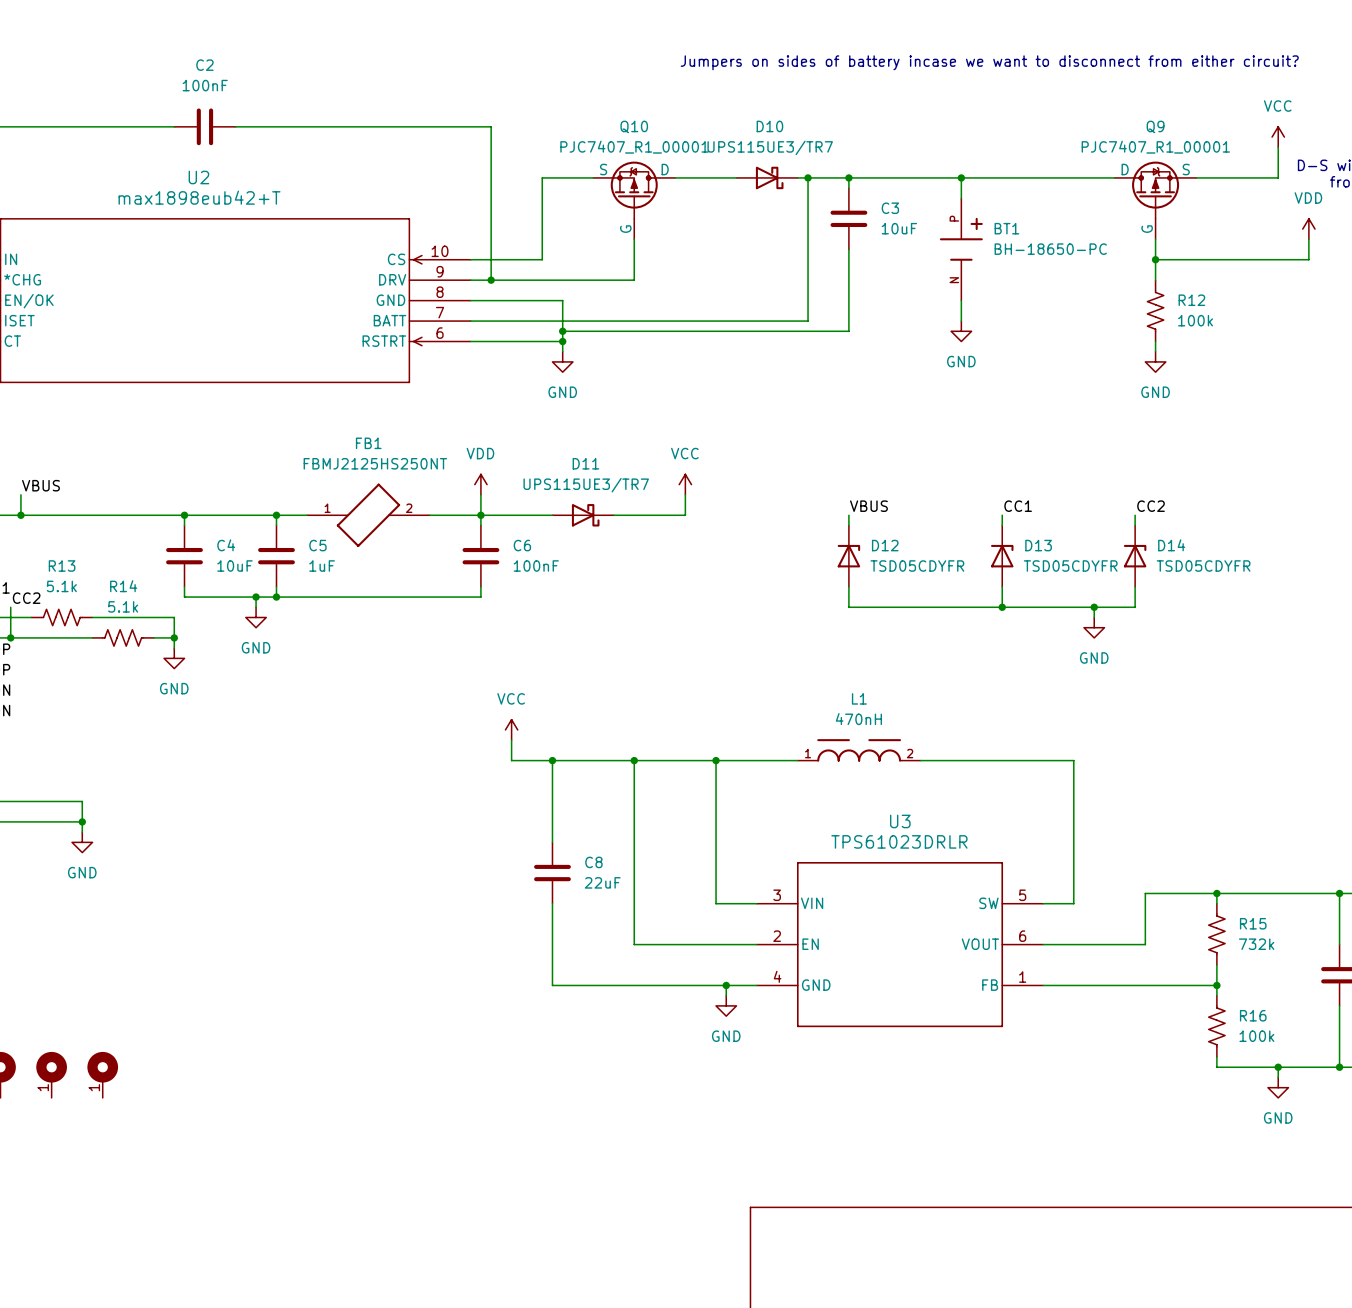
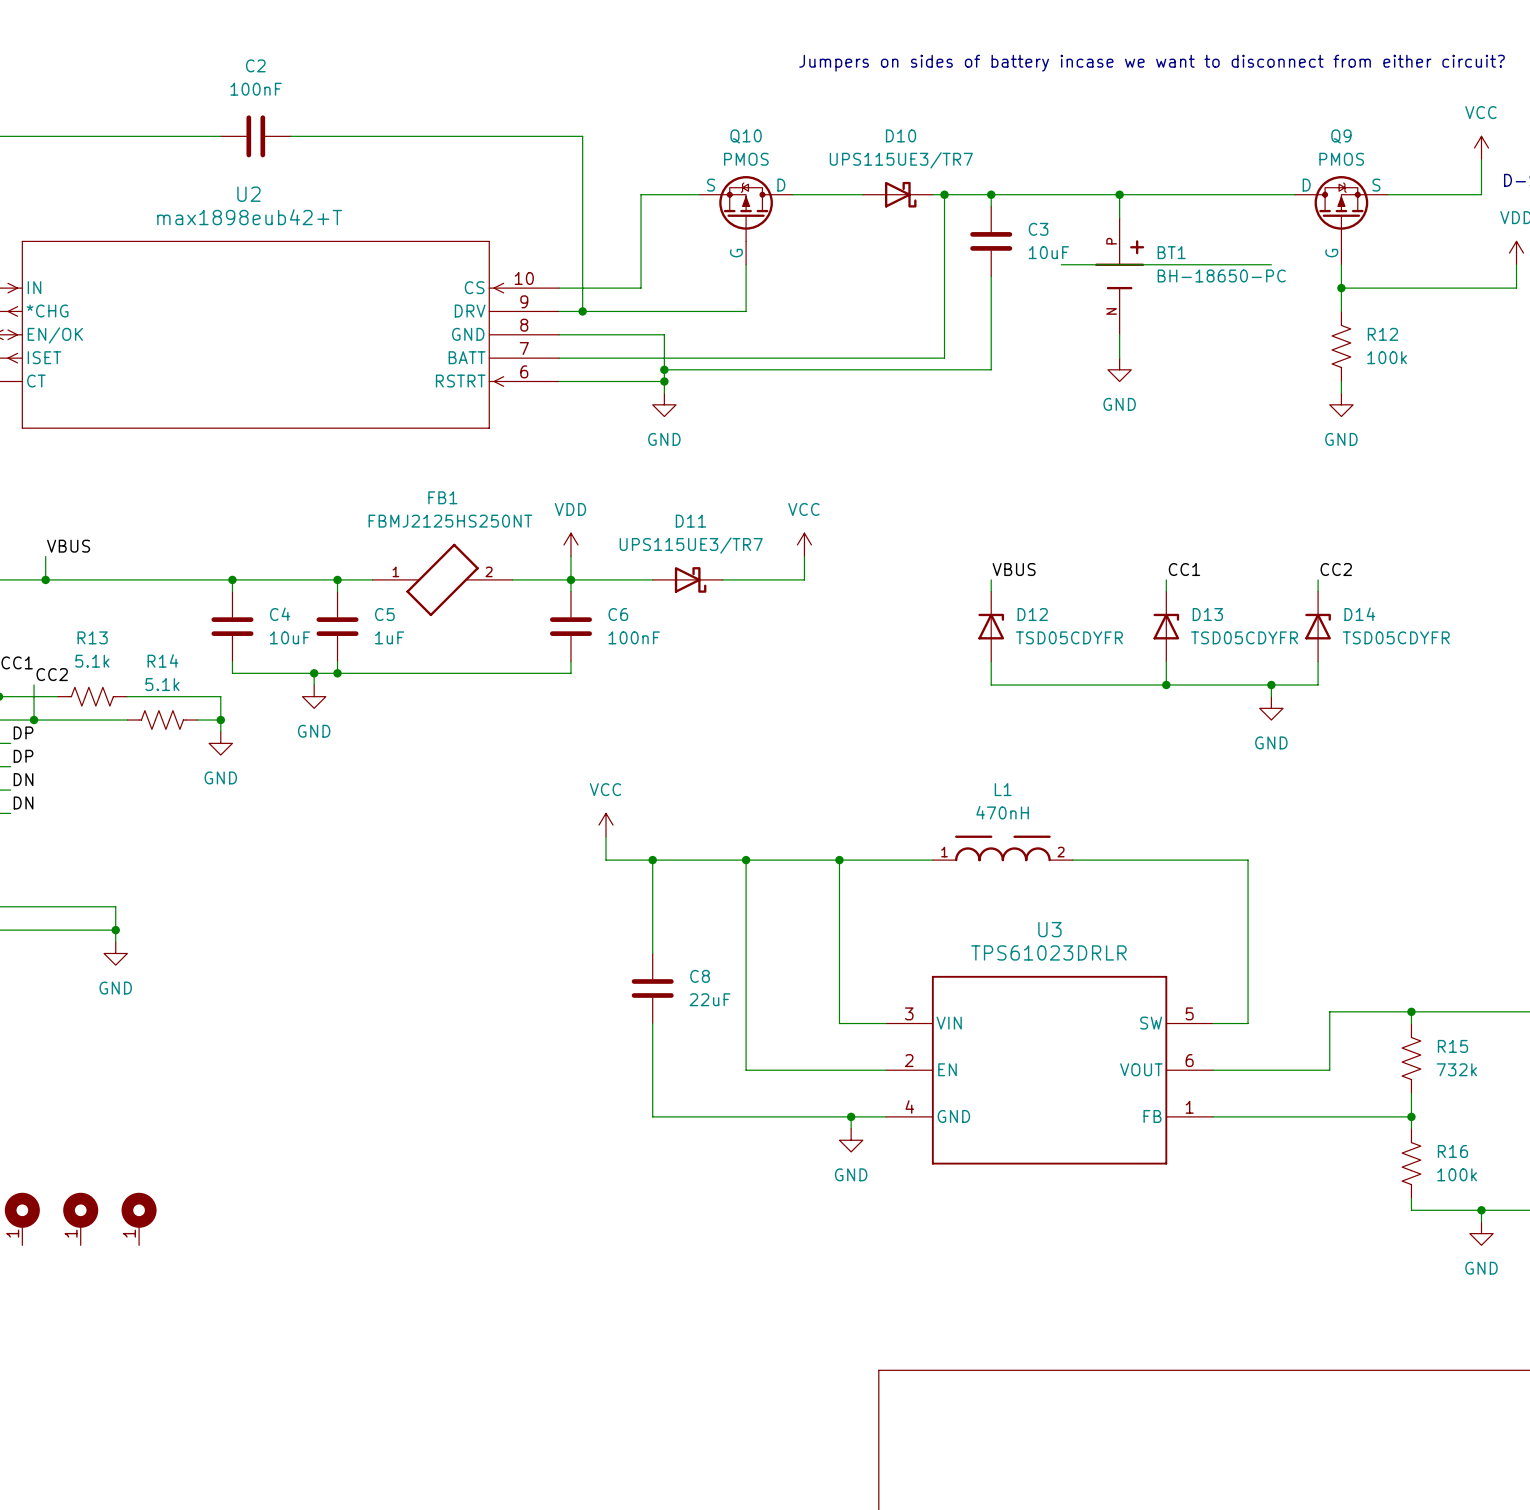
Q10 value: PJC7407_R1_00001 (634, 147) -> PMOS (746, 159)
Q9 value: PJC7407_R1_00001 (1155, 147) -> PMOS (1341, 159)
wire: none -> (1061, 264) (1271, 264)

